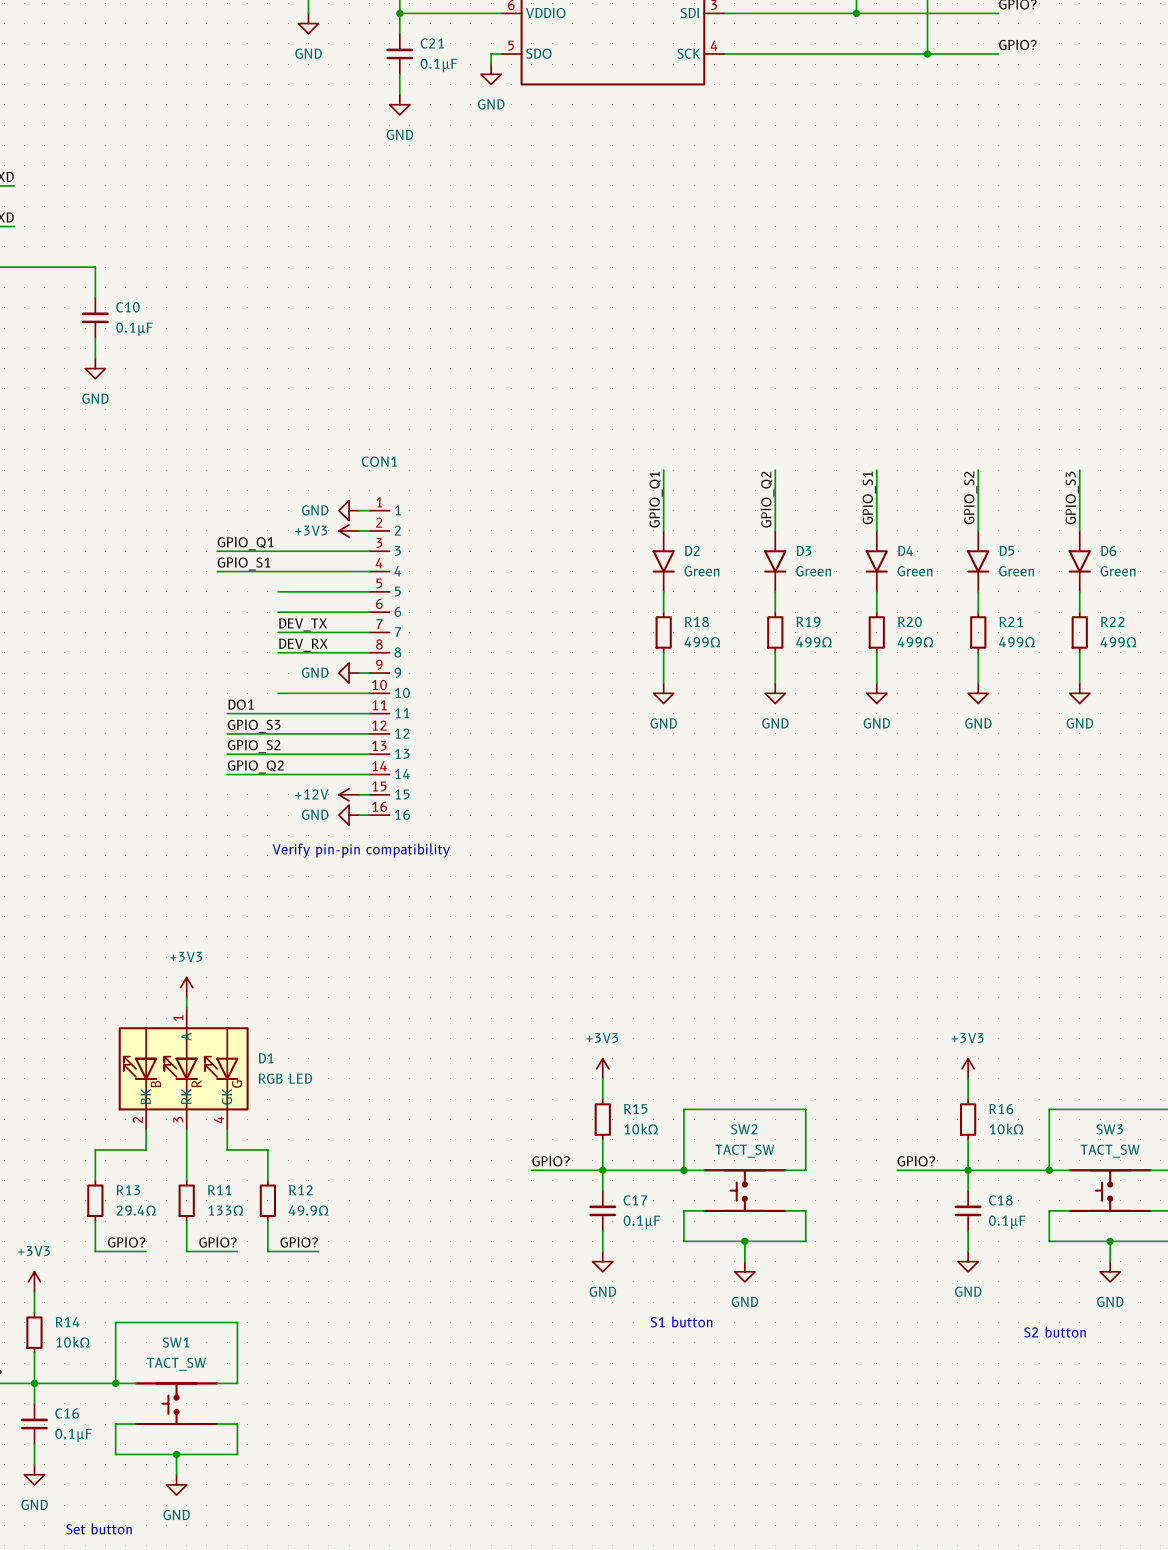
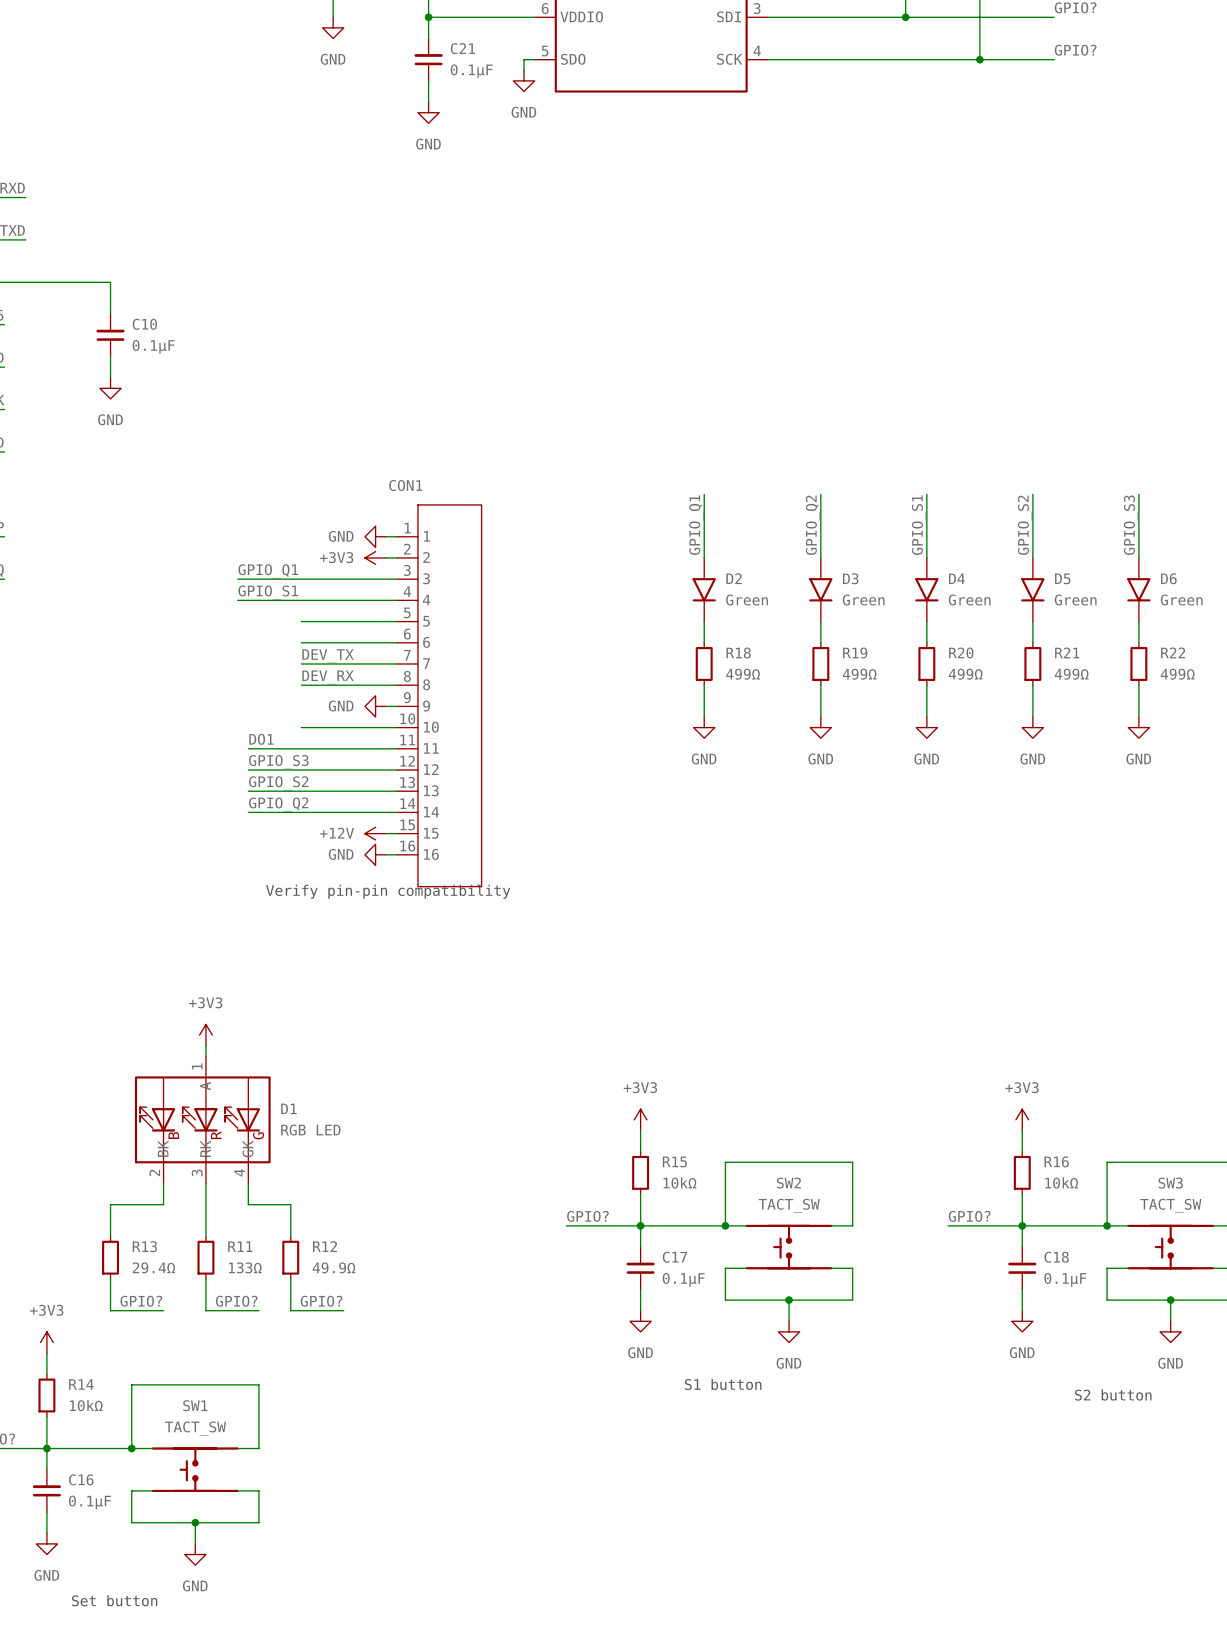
CON1 symbol: [369, 510, 390, 816] -> [396, 504, 482, 887]

